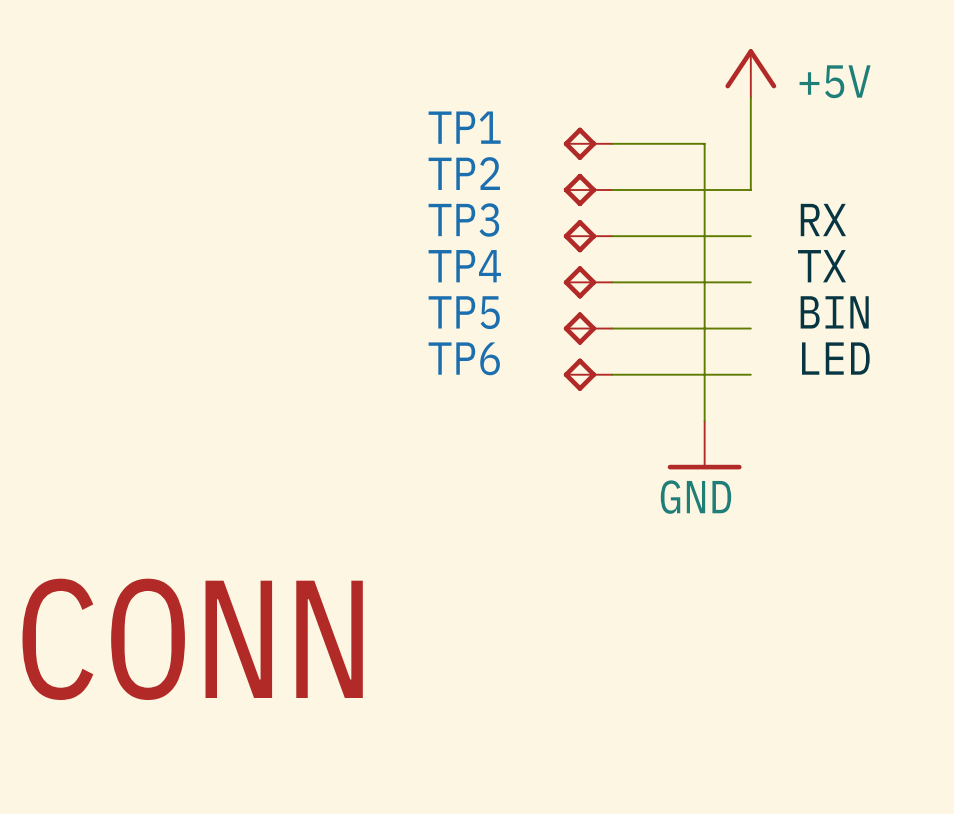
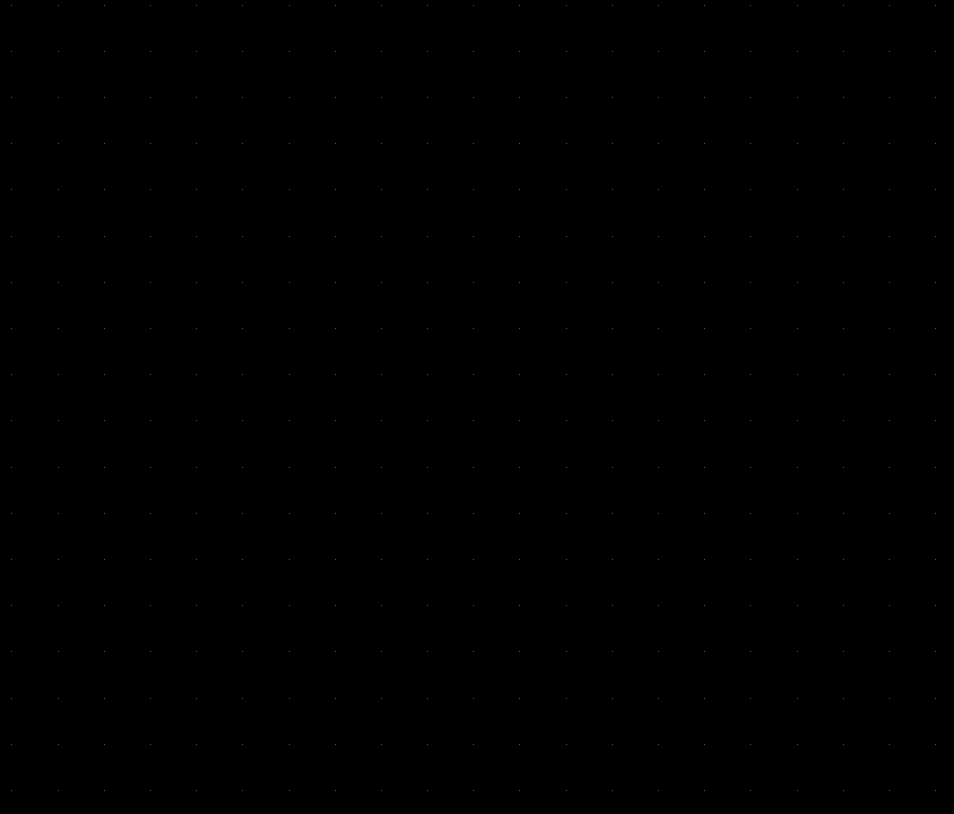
power symbol: +5V (750, 73) -> none
wire: (750, 97) (750, 189) (612, 189) -> none
TP1: (588, 143) -> none
wire: (612, 143) (704, 143) (704, 420) -> none
TP2: (588, 189) -> none
label: RX (823, 220) -> none
TP3: (588, 236) -> none
wire: (612, 236) (750, 236) -> none
label: TX (822, 266) -> none
TP4: (588, 282) -> none
wire: (612, 282) (750, 282) -> none
label: BIN (834, 312) -> none
TP5: (588, 328) -> none
wire: (612, 328) (750, 328) -> none
label: LED (835, 358) -> none
TP6: (588, 374) -> none
wire: (612, 374) (750, 374) -> none
power symbol: GND (704, 445) -> none
text: CONN (192, 639) -> none

